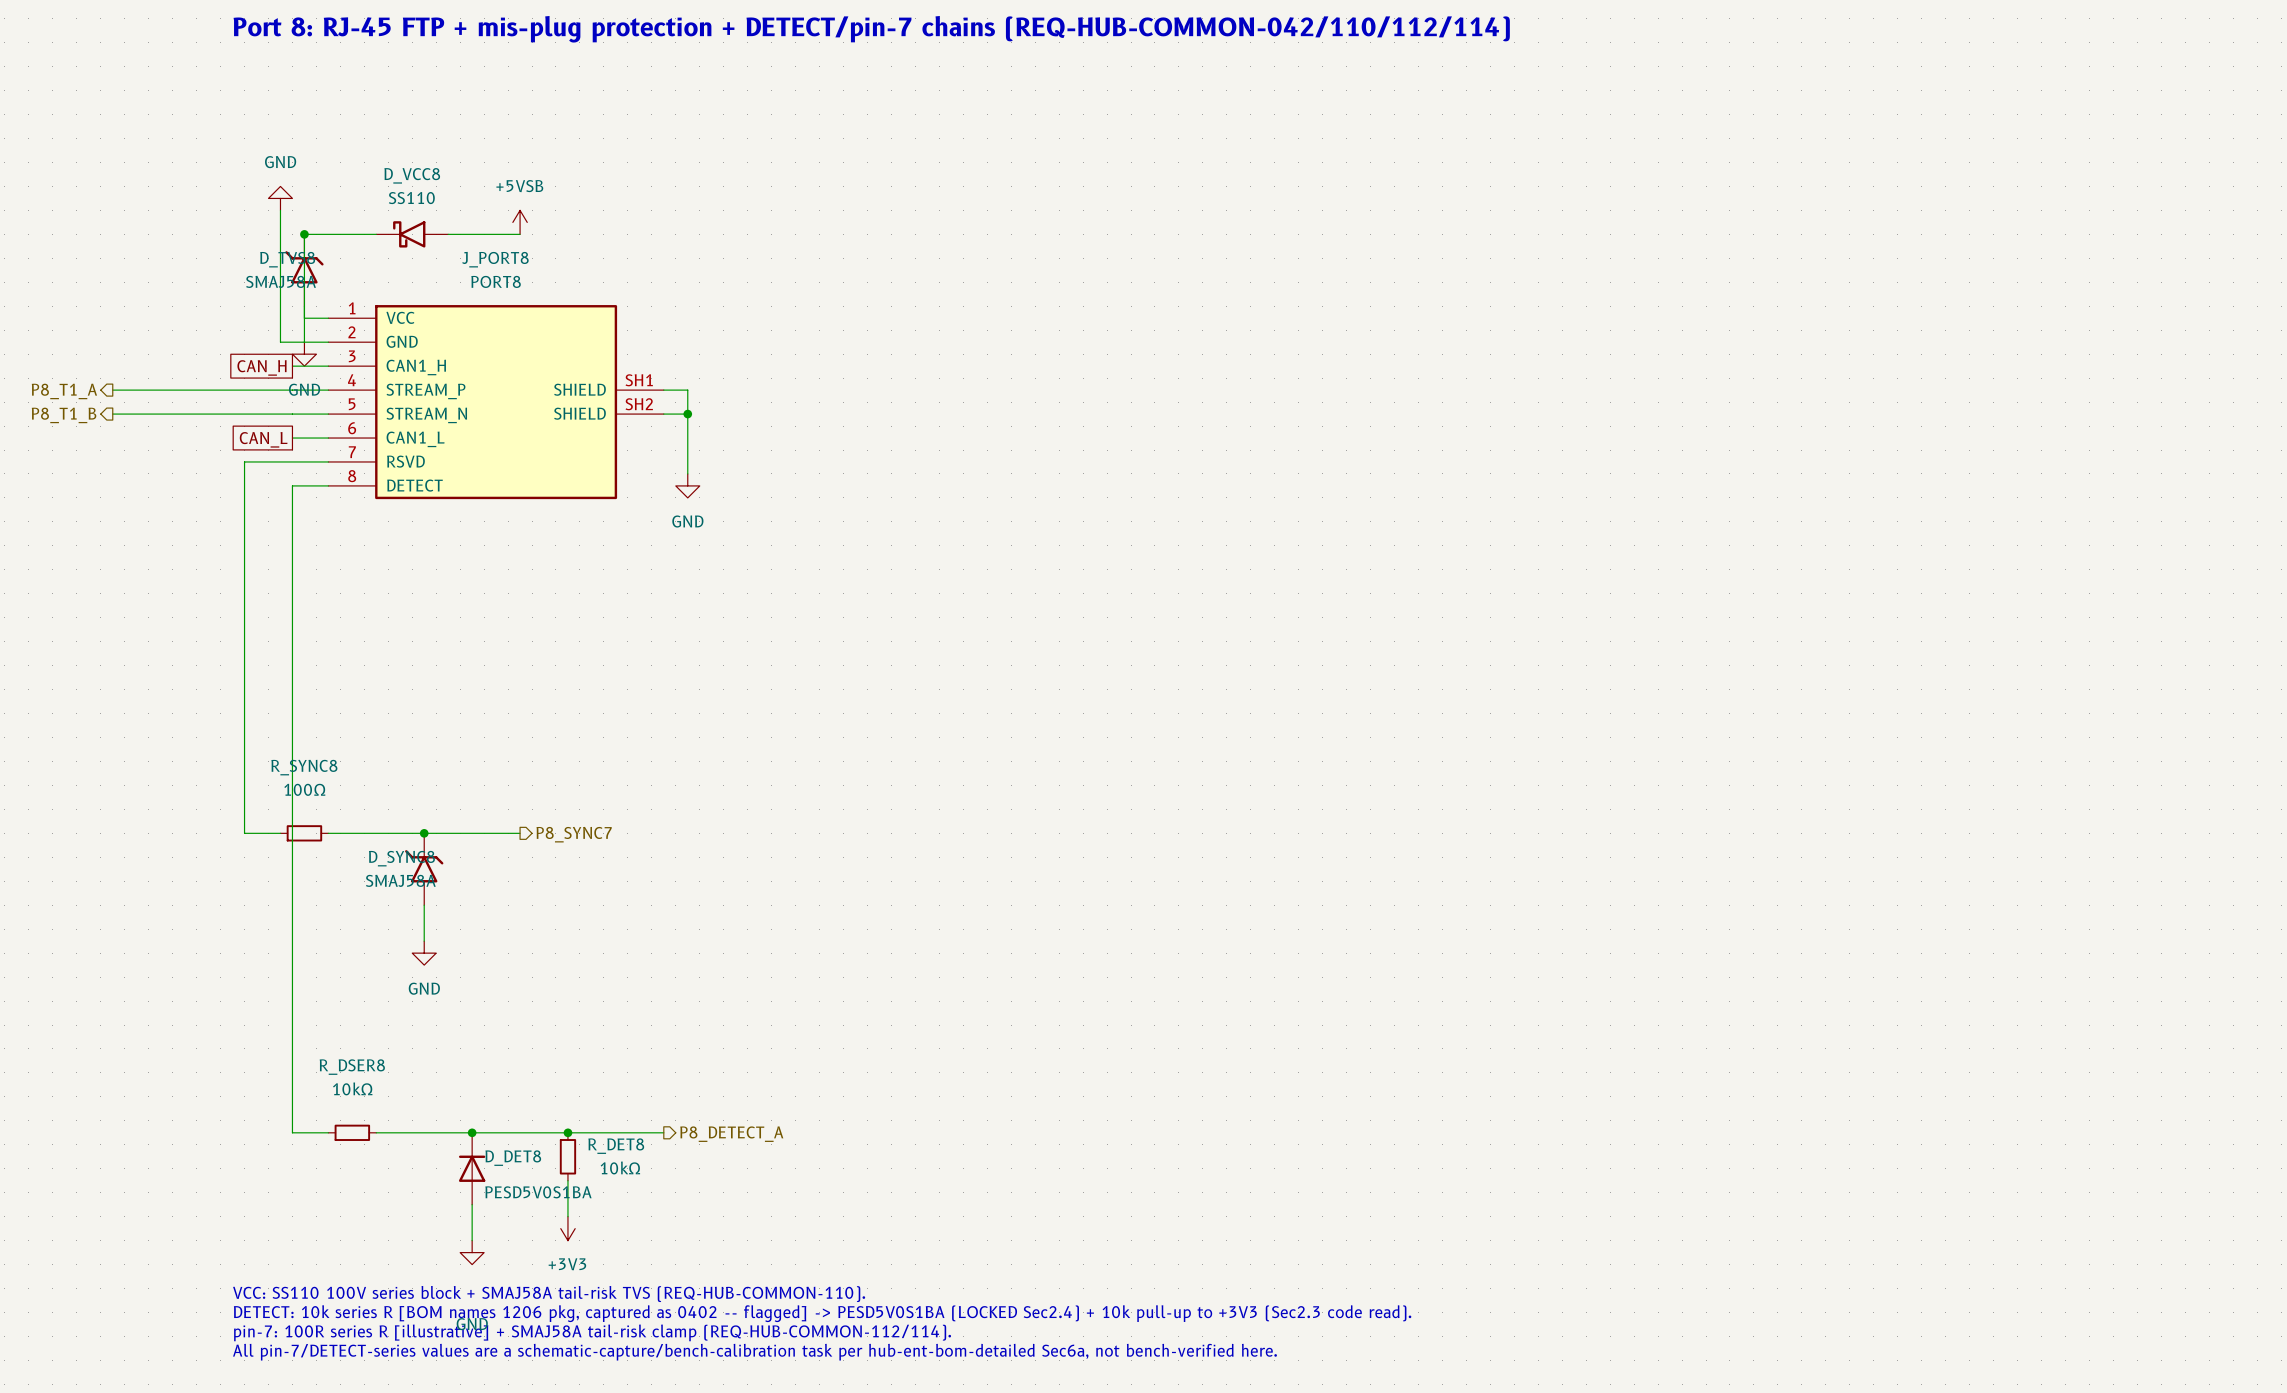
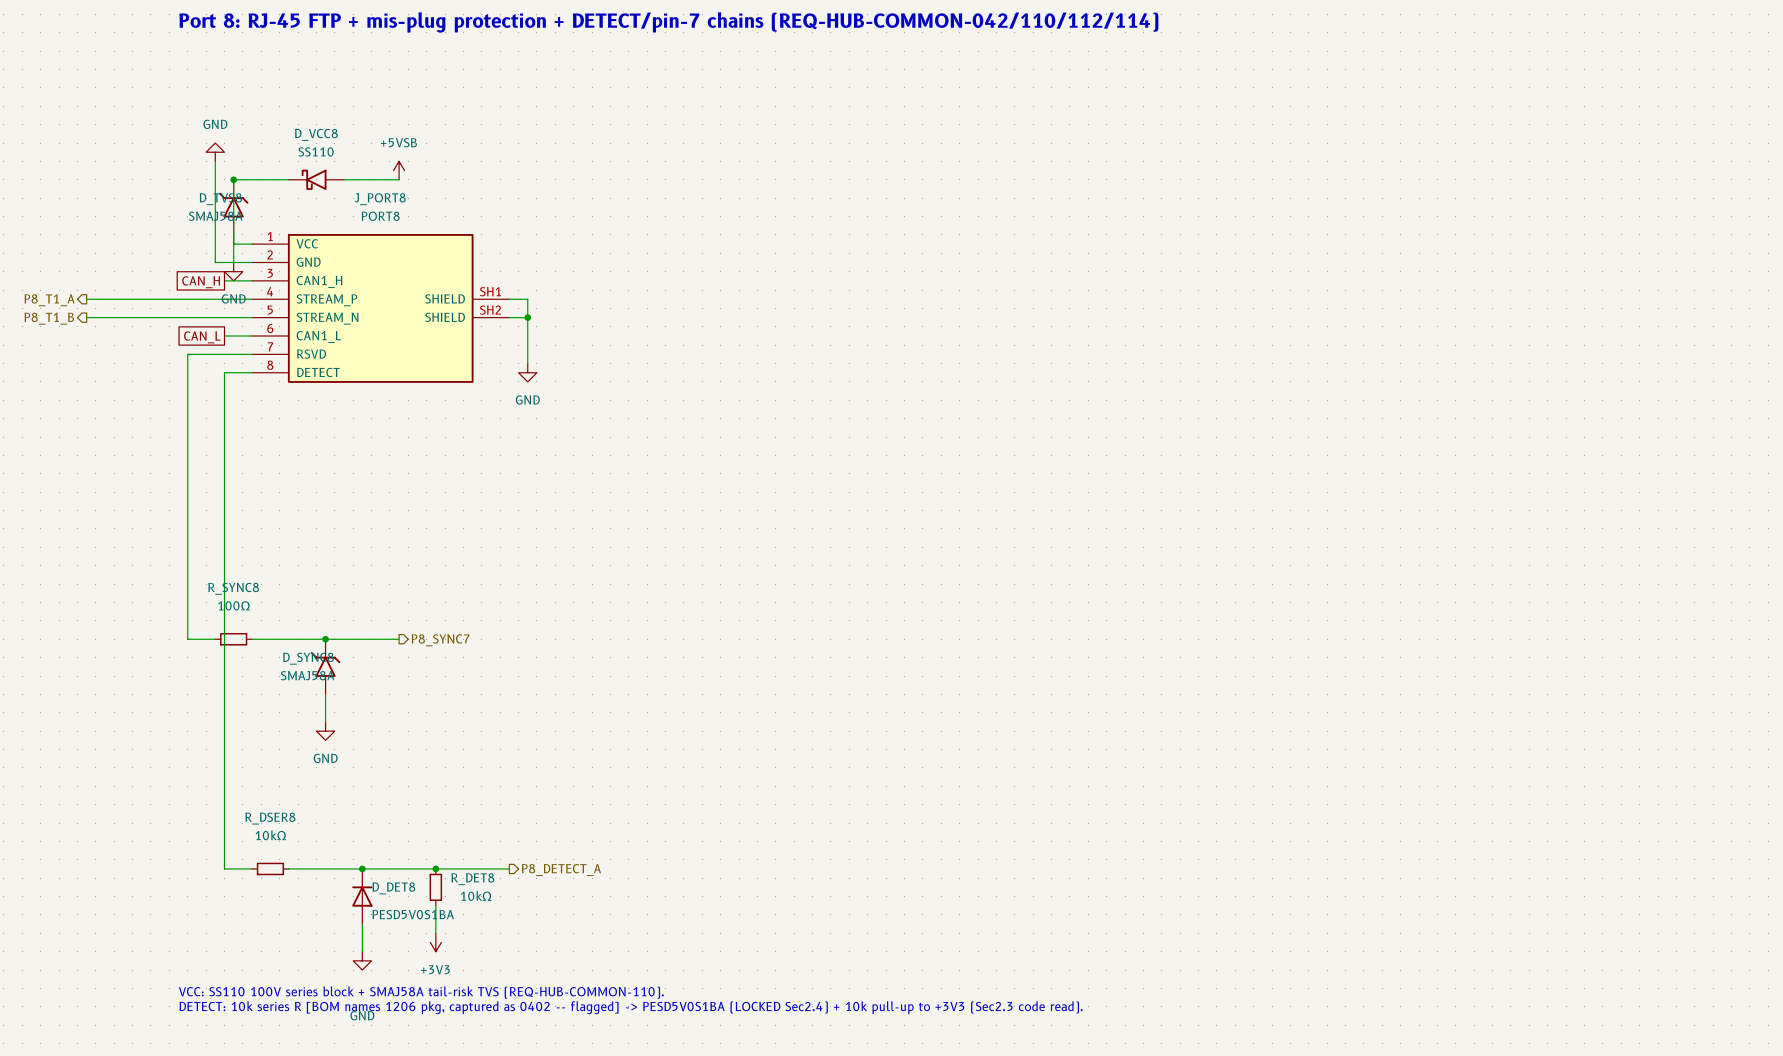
text: pin-7: 100R series R [illustrative] + SMAJ58A tail-risk clamp (REQ-HUB-COMMON-112/114). (592, 1332) -> none
text: All pin-7/DETECT-series values are a schematic-capture/bench-calibration task per hub-ent-bom-detailed Sec6a, not bench-verified here. (754, 1352) -> none

